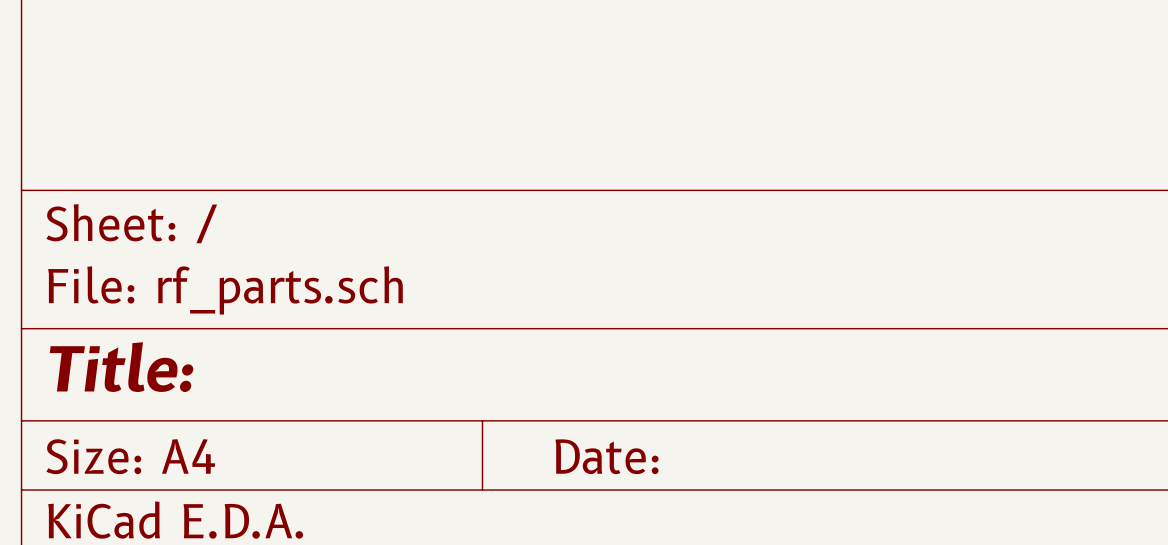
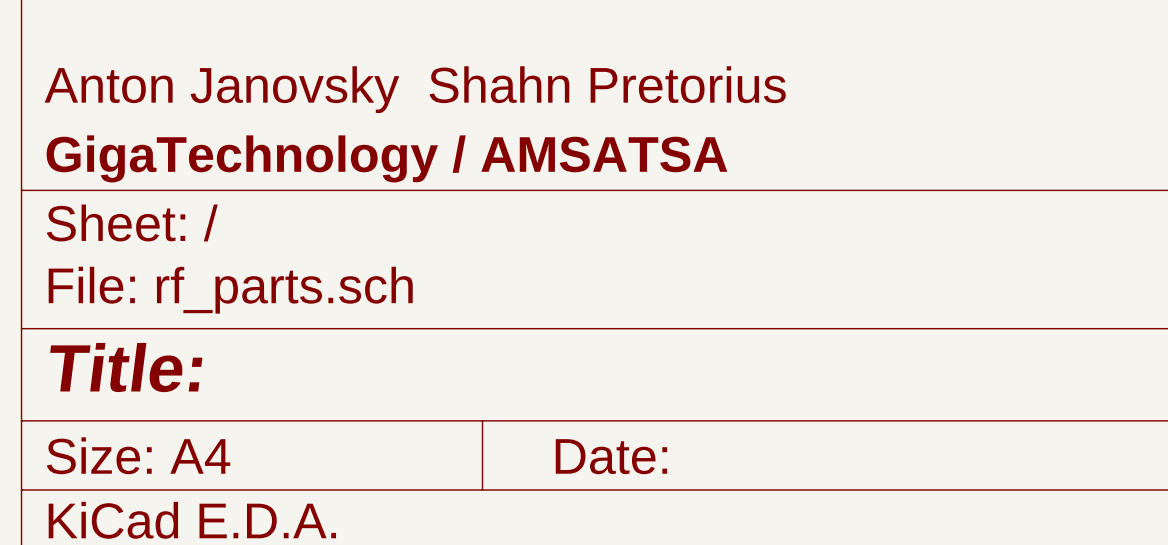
title block: none -> Anton Janovsky Shahn Pretorius (415, 89)
title block: none -> GigaTechnology / AMSATSA (386, 158)

